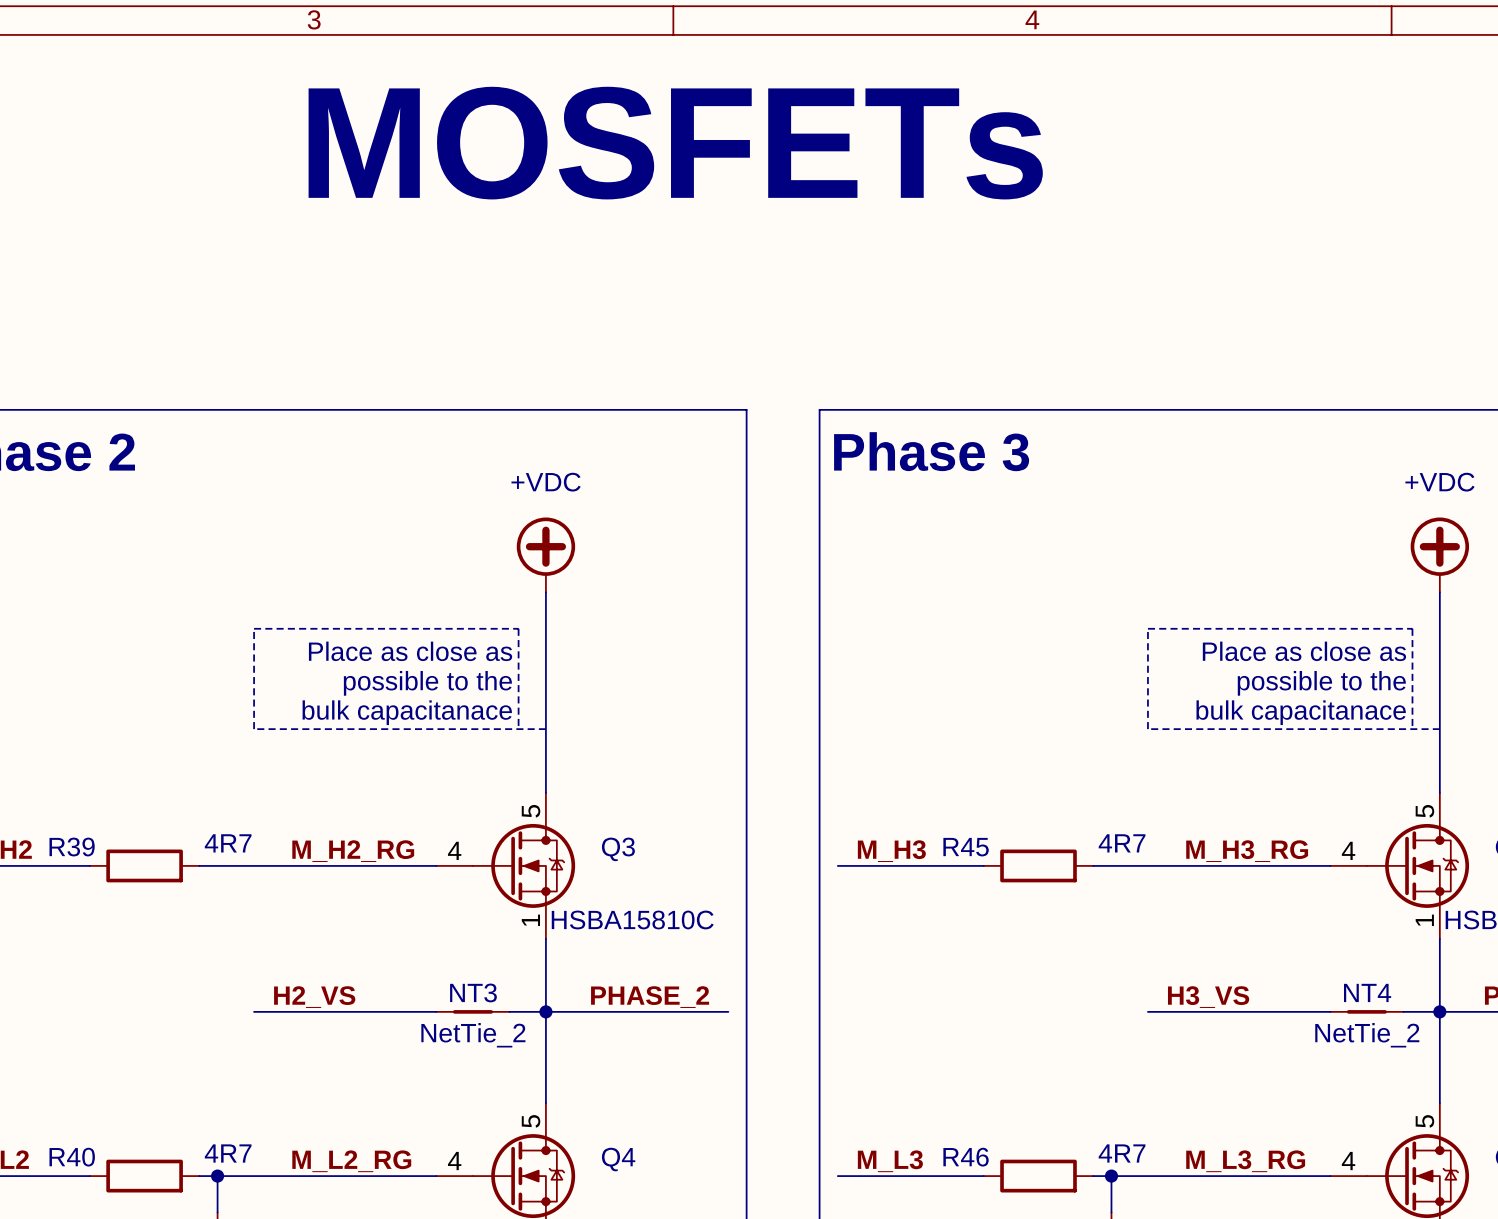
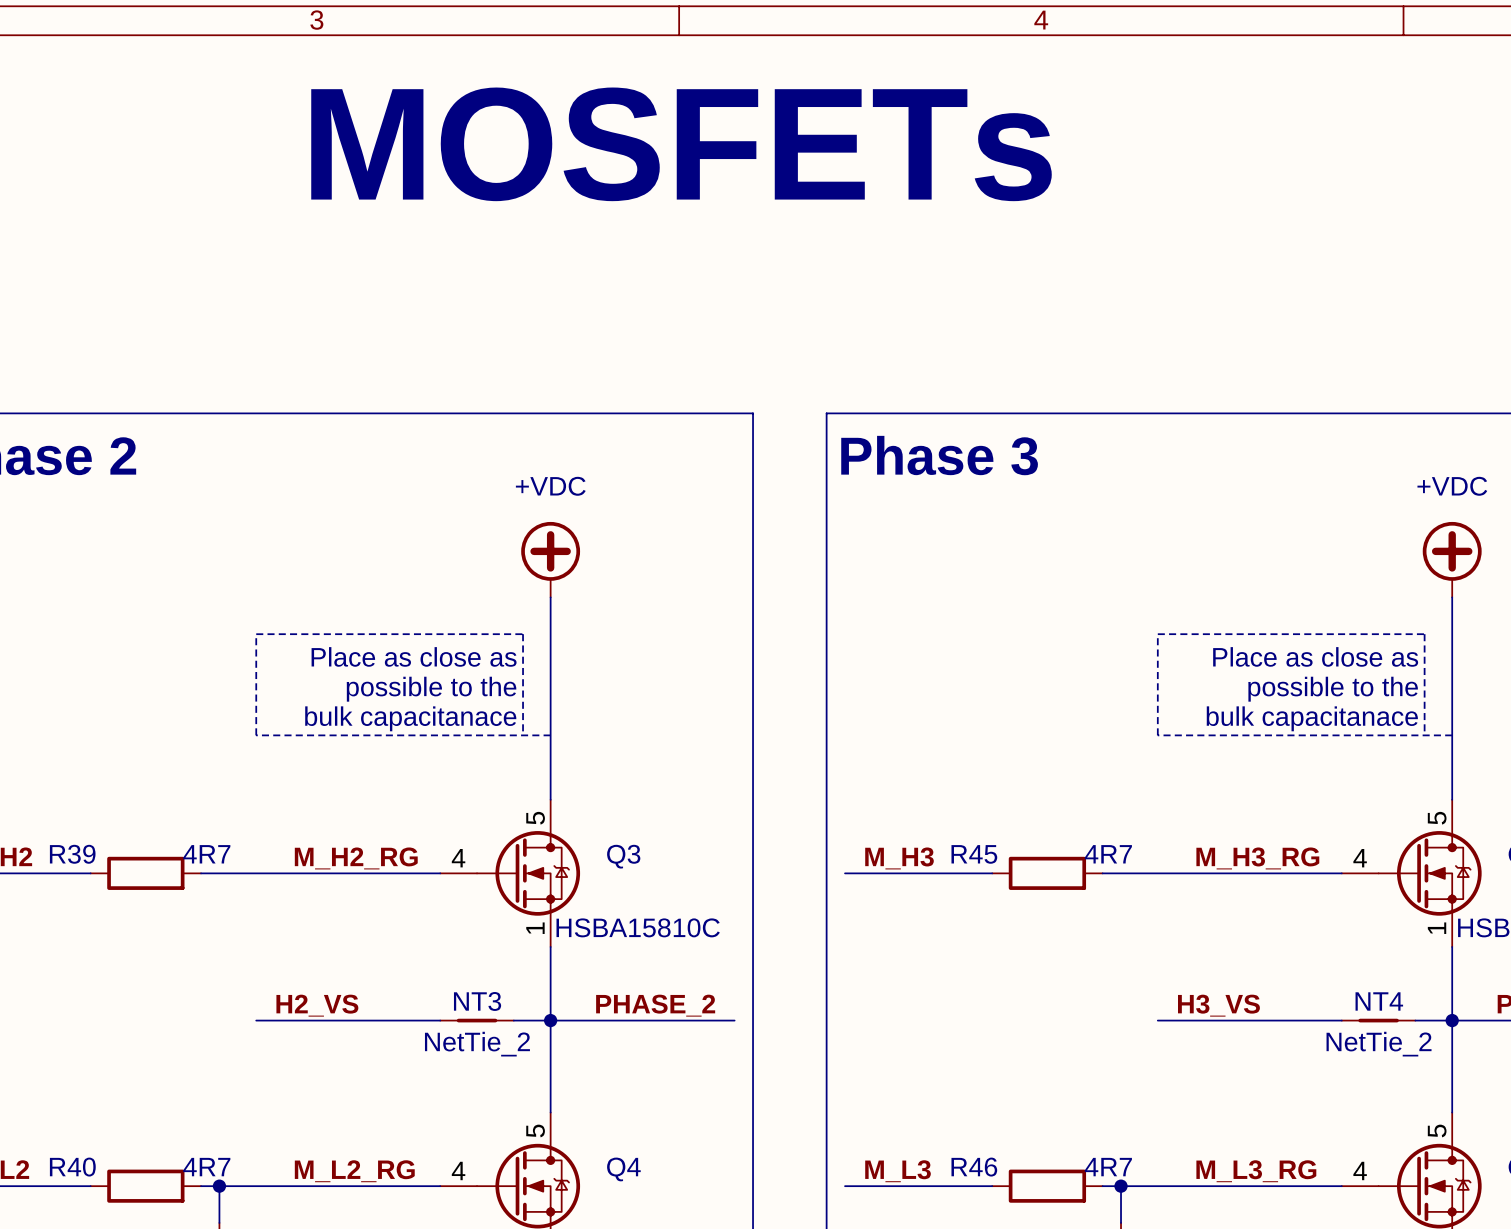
R39 value position: 4R7 (228, 843) -> 4R7 (206, 854)
R45 value position: 4R7 (1122, 843) -> 4R7 (1108, 854)
R40 value position: 4R7 (228, 1153) -> 4R7 (206, 1167)
R46 value position: 4R7 (1122, 1153) -> 4R7 (1108, 1167)

